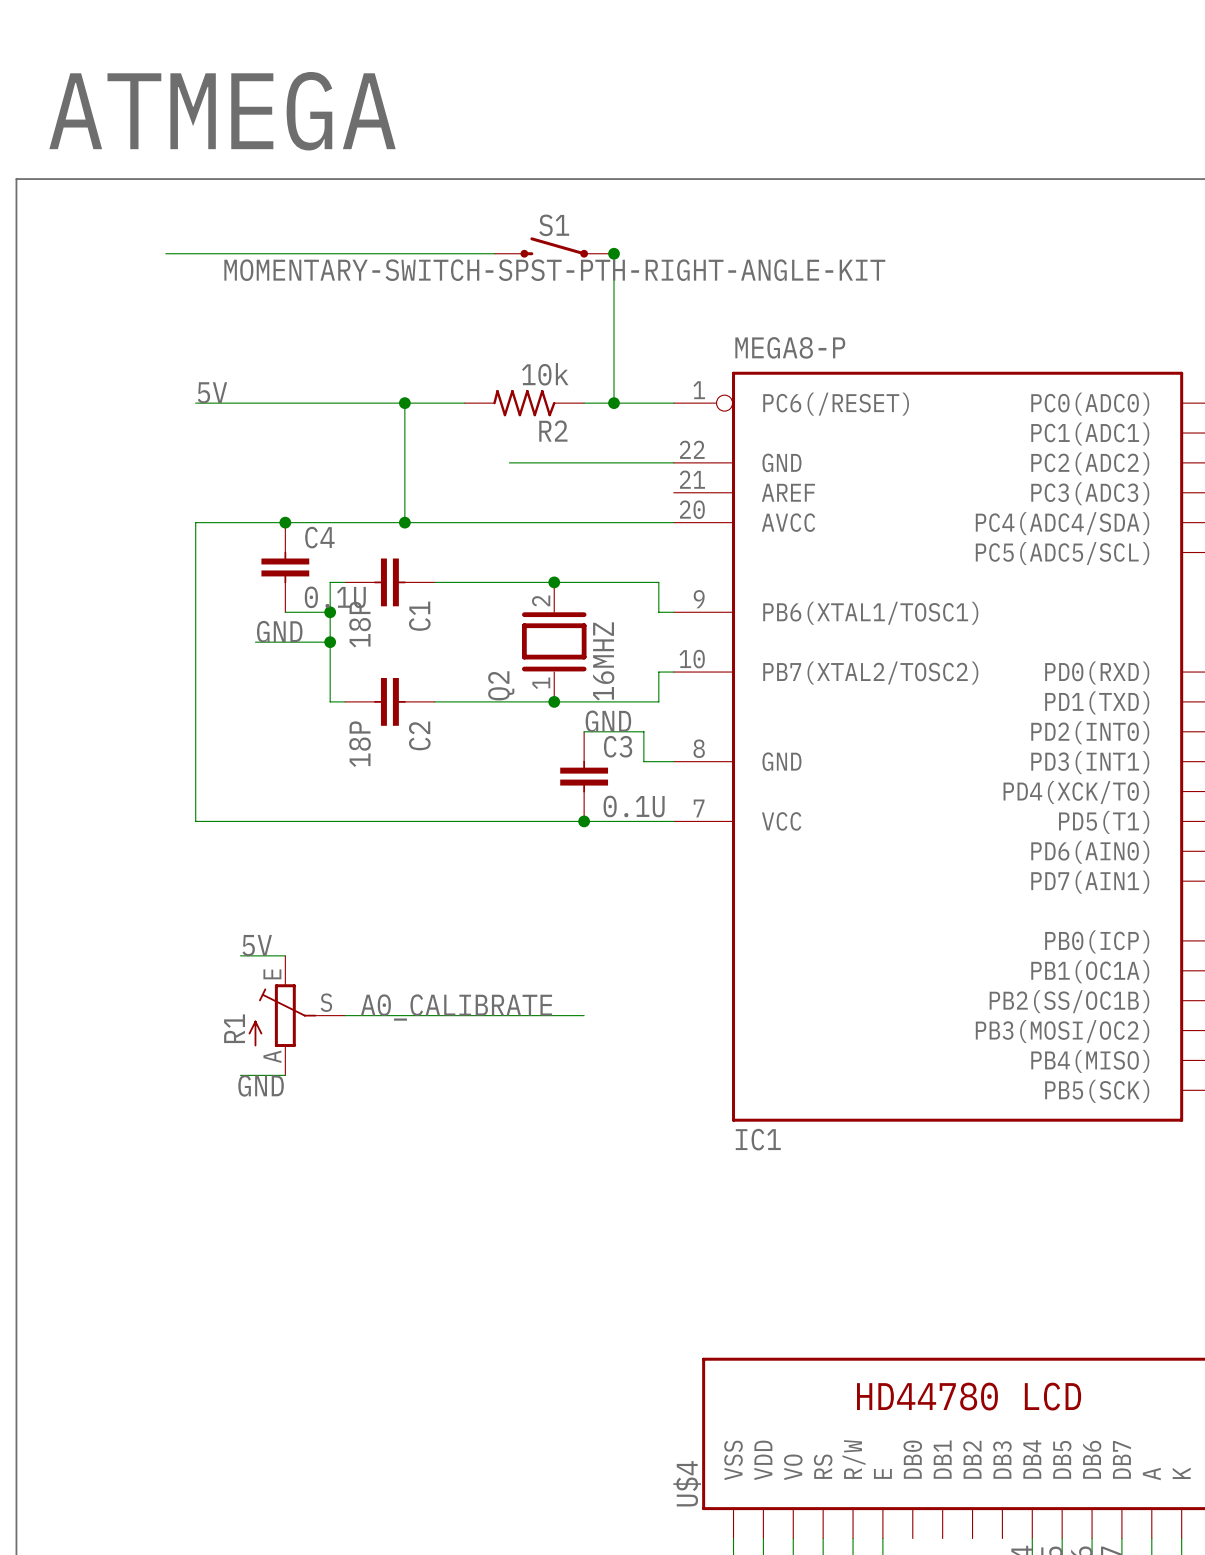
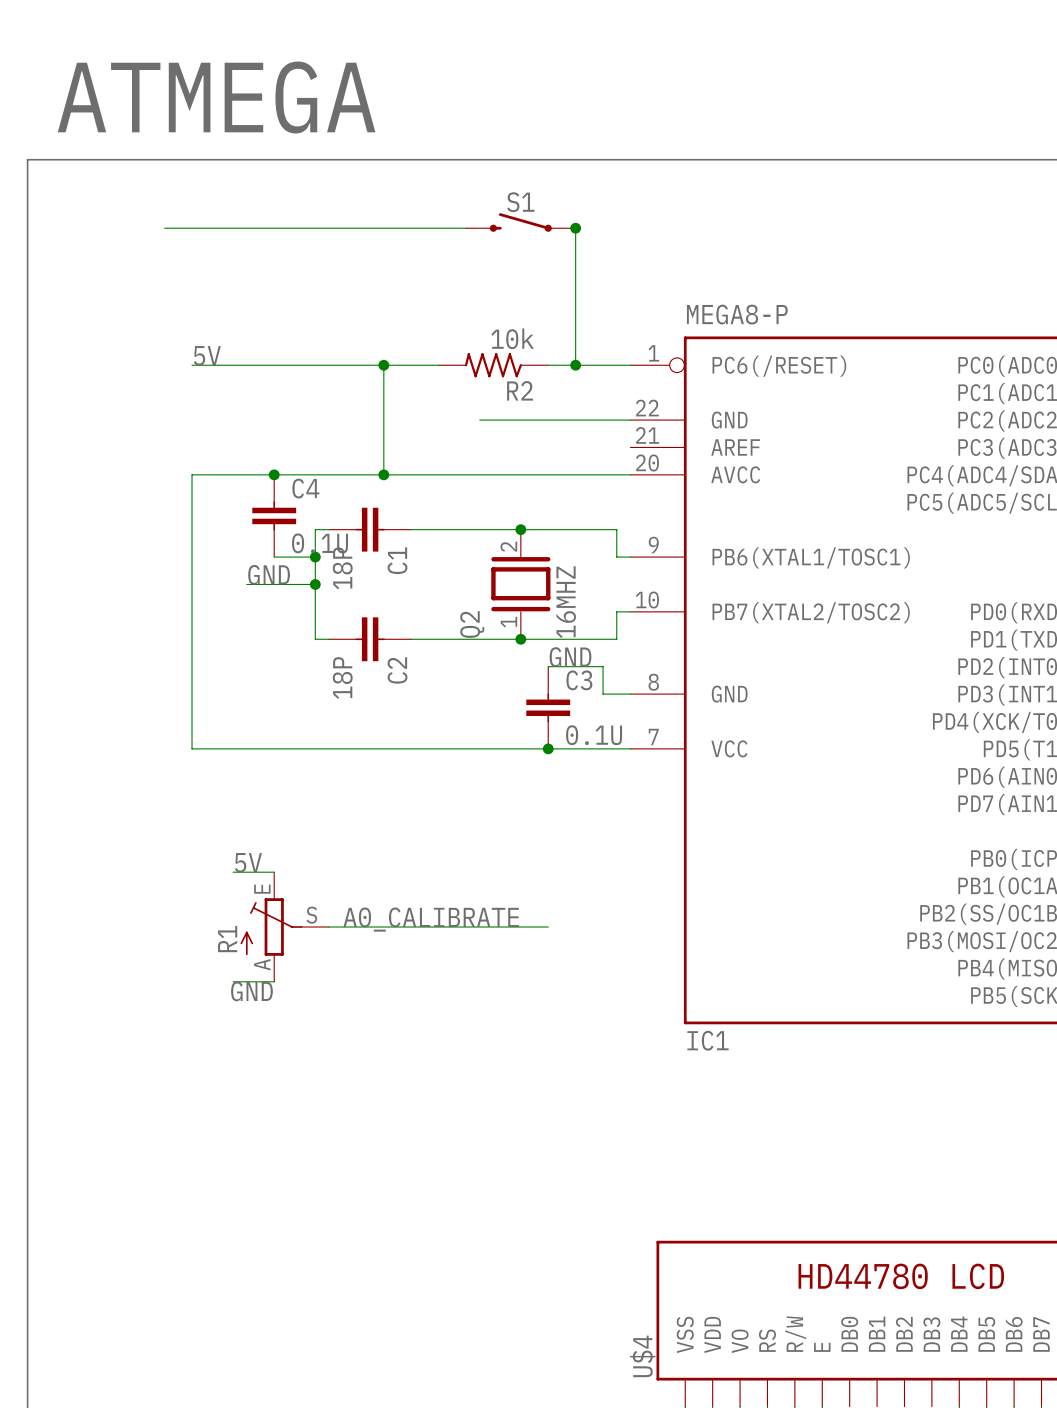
S1 value: MOMENTARY-SWITCH-SPST-PTH-RIGHT-ANGLE-KIT (554, 270) -> none

